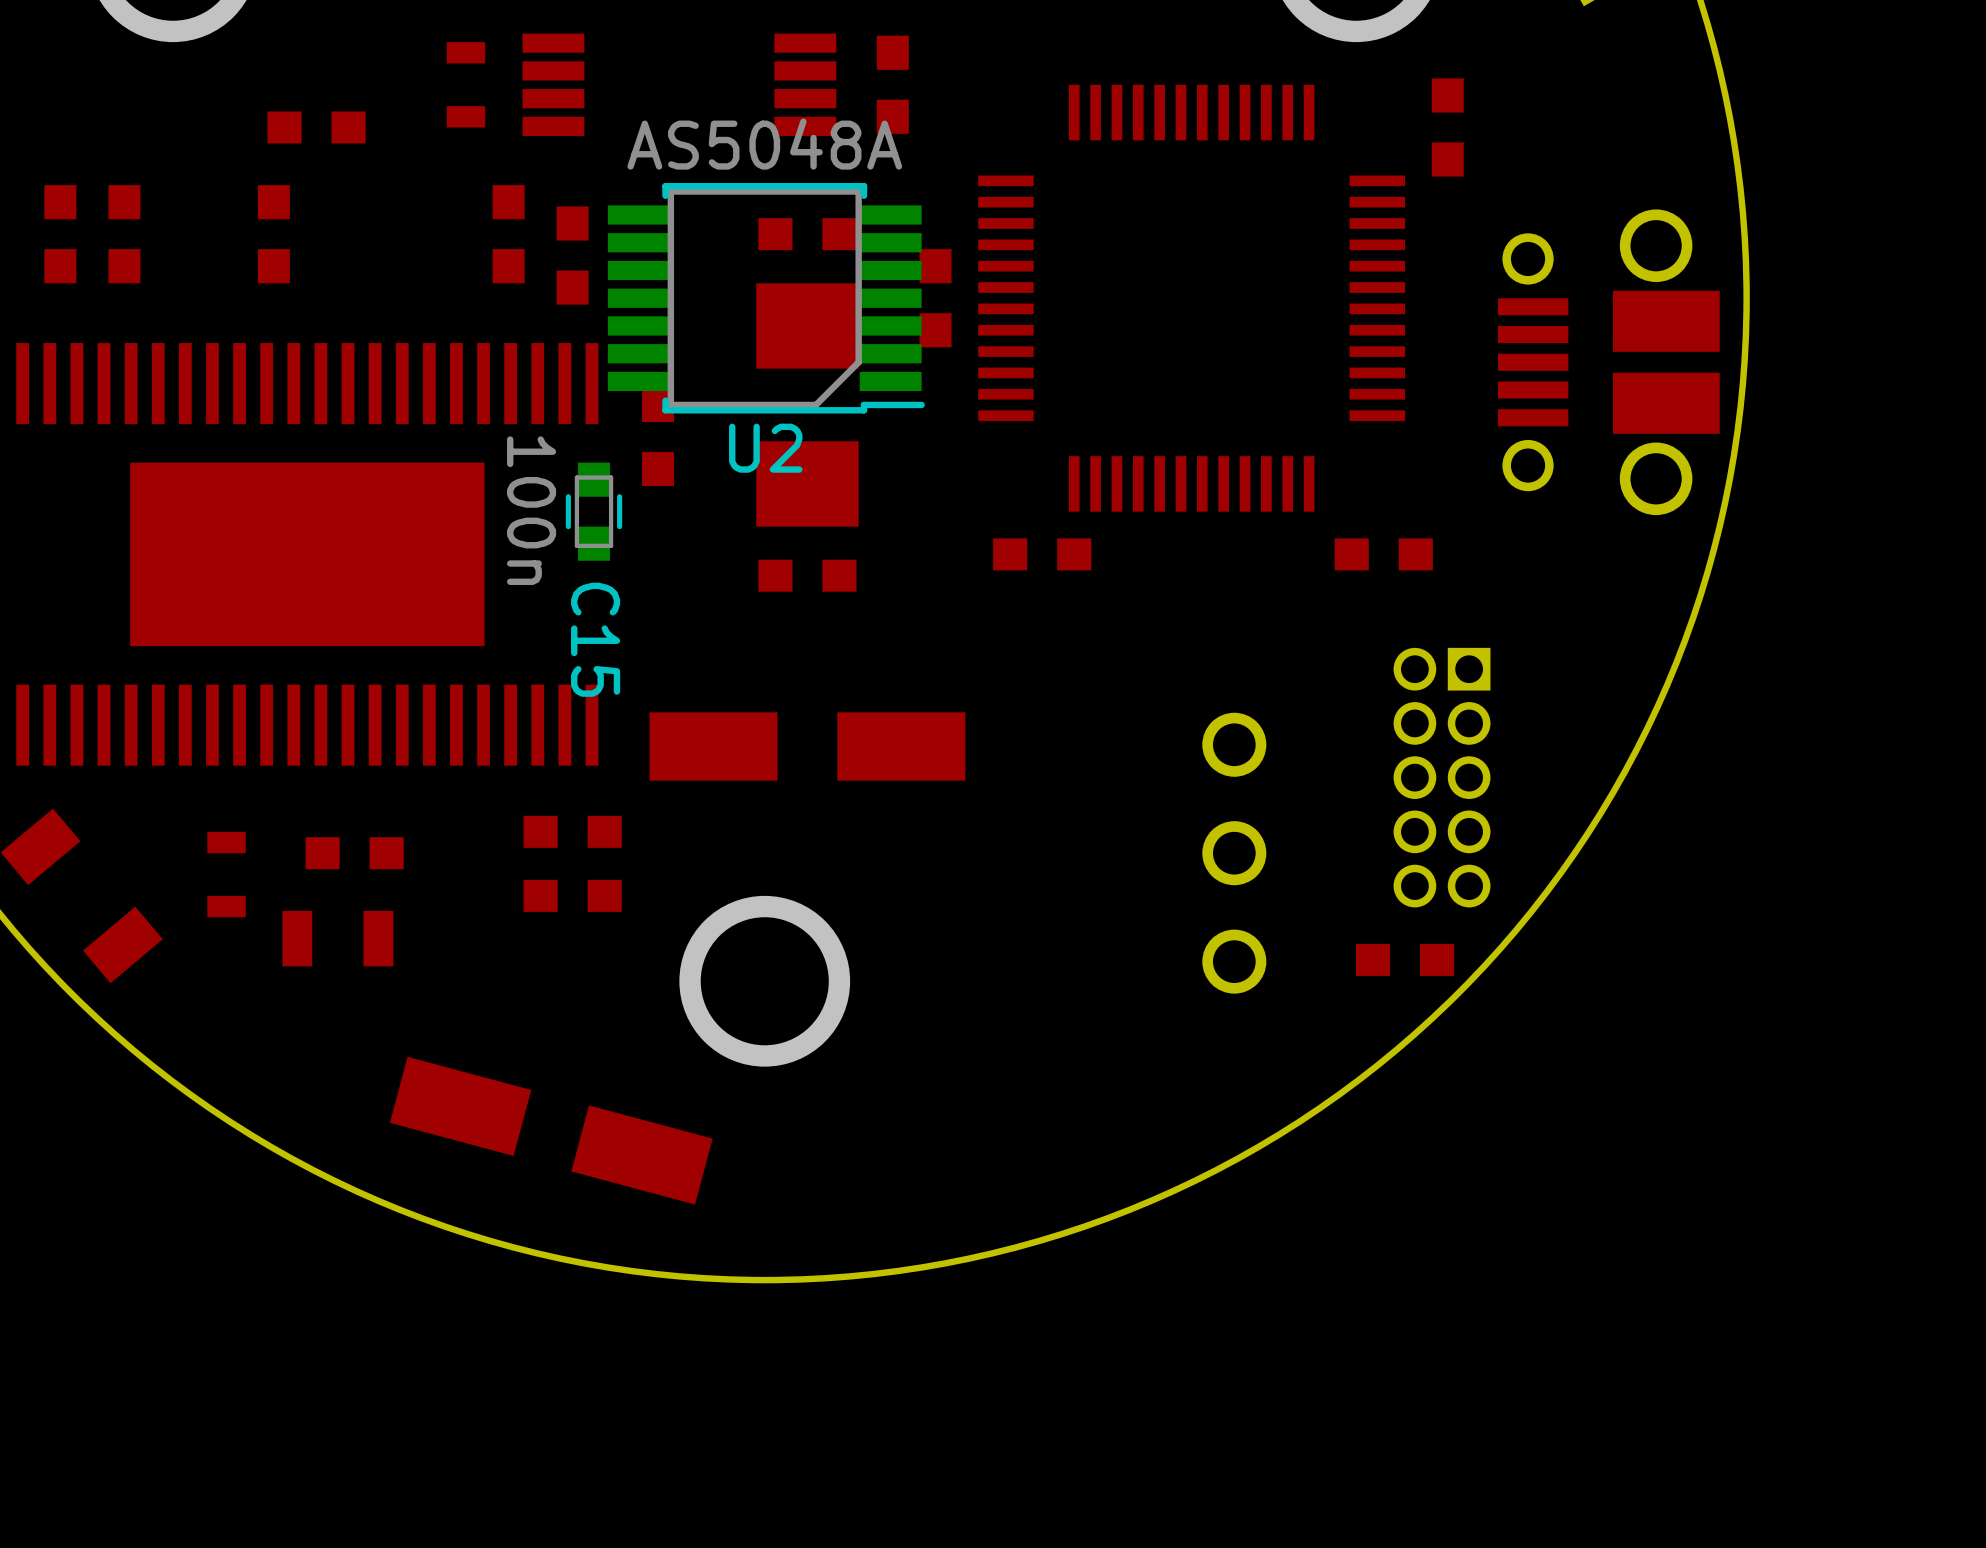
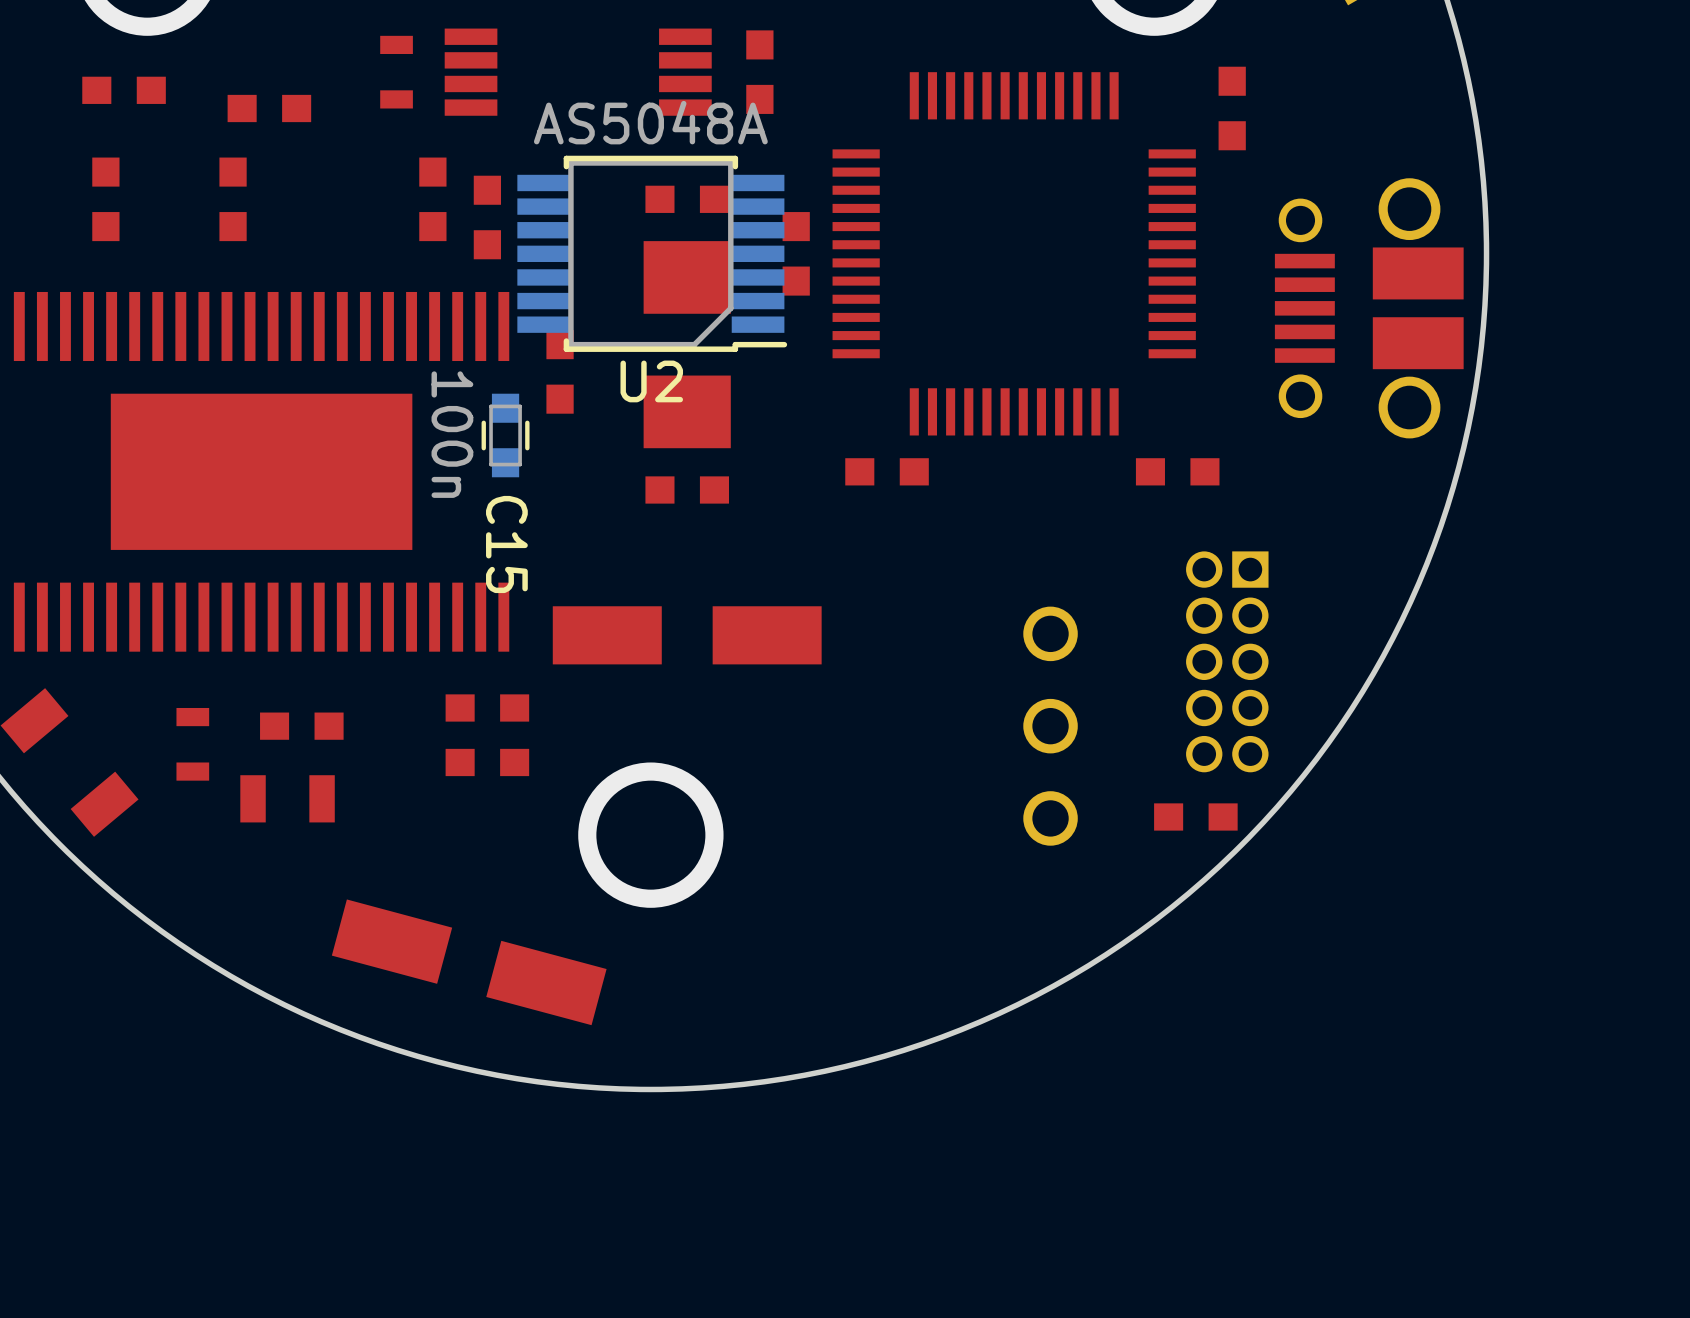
part rotation: 0° (60, 234) -> 90° clockwise (124, 90)
part position: (60, 234) -> (124, 90)

